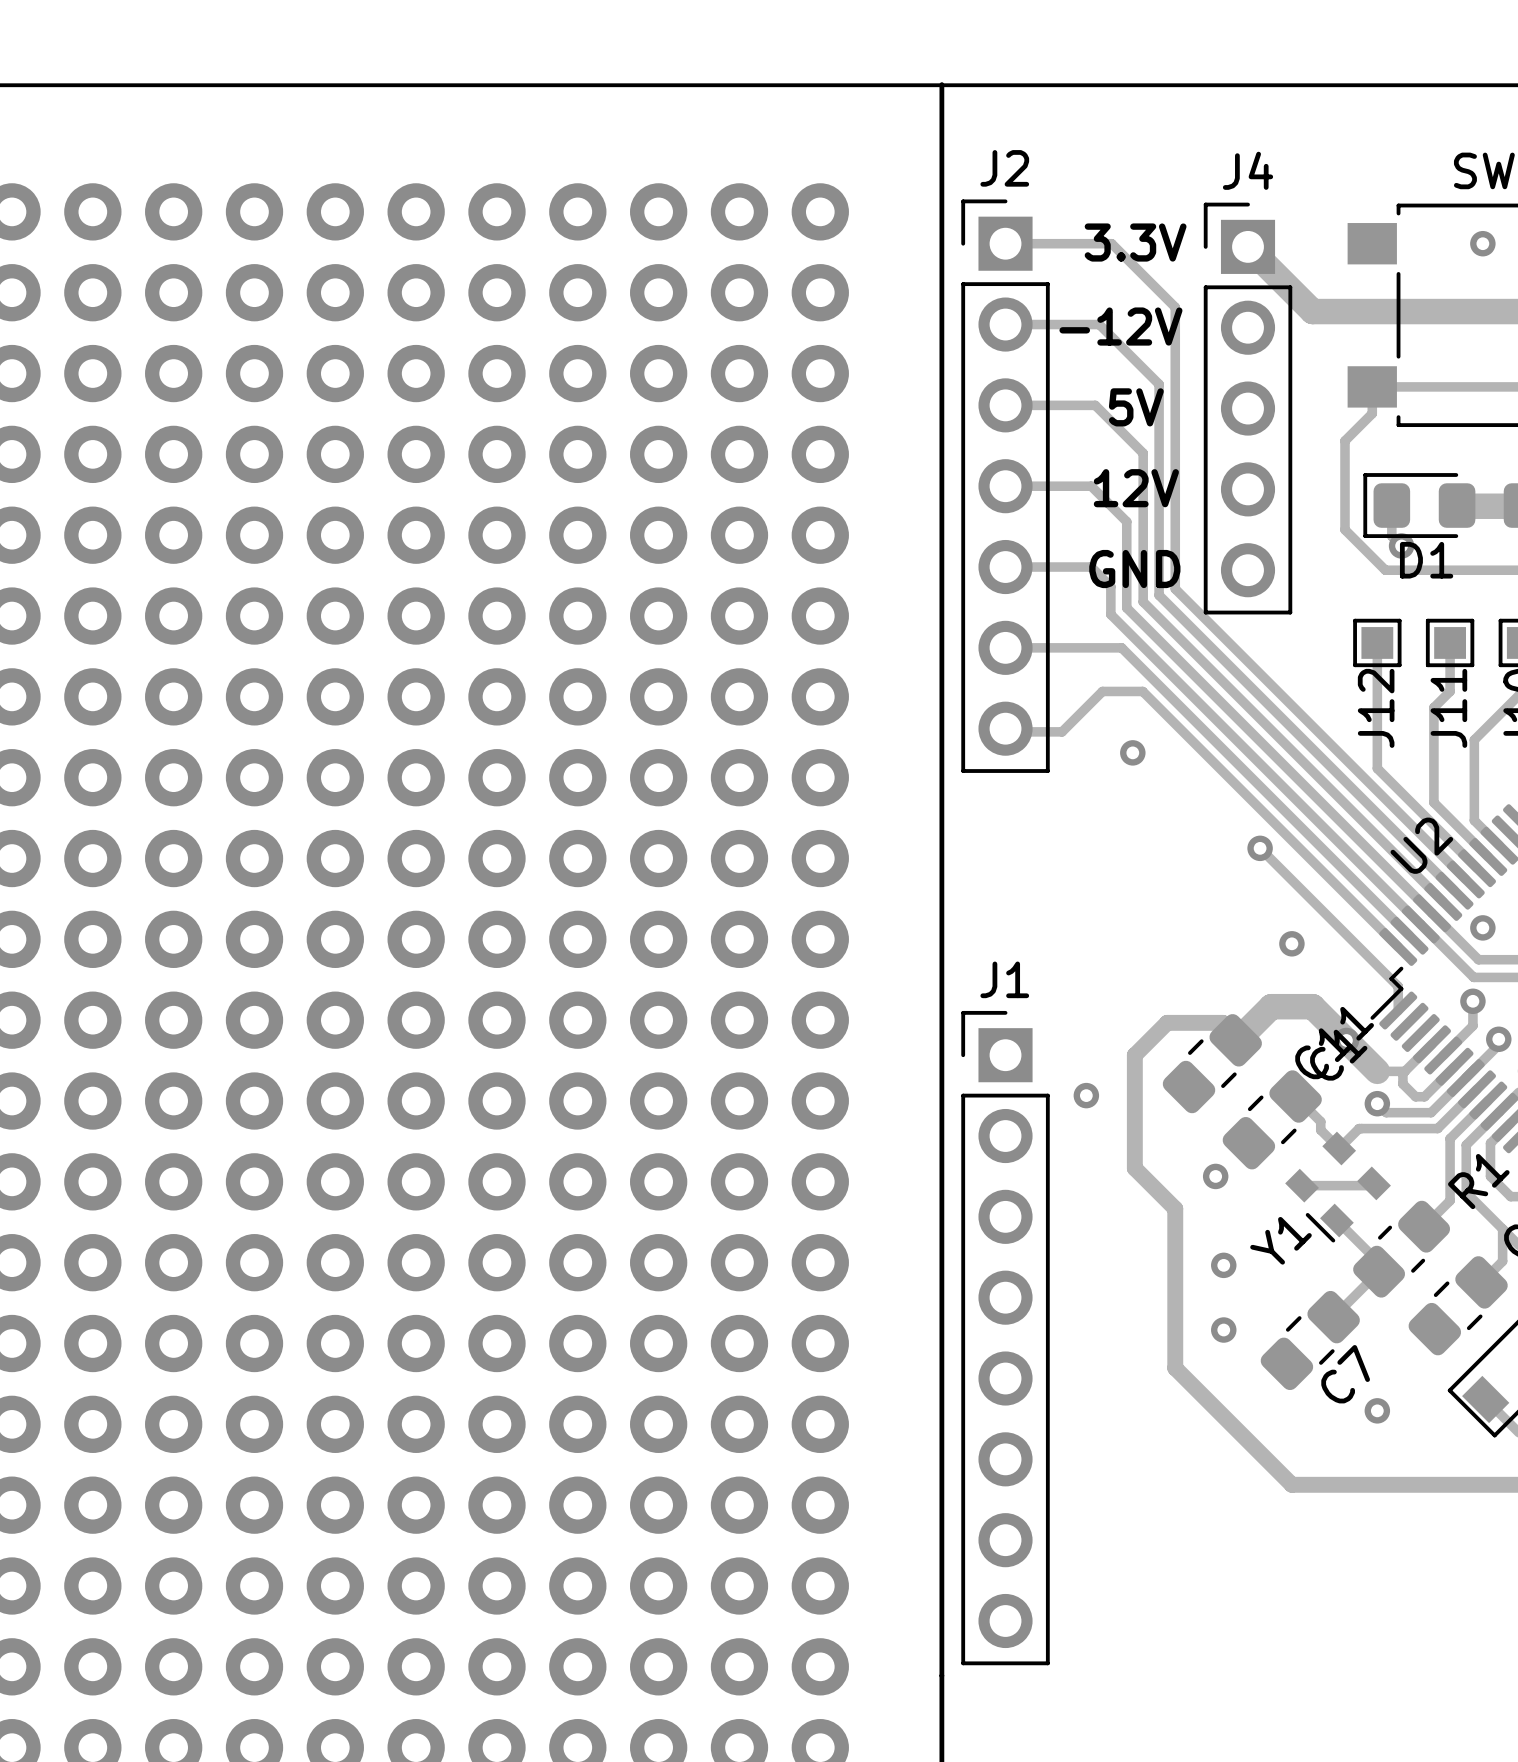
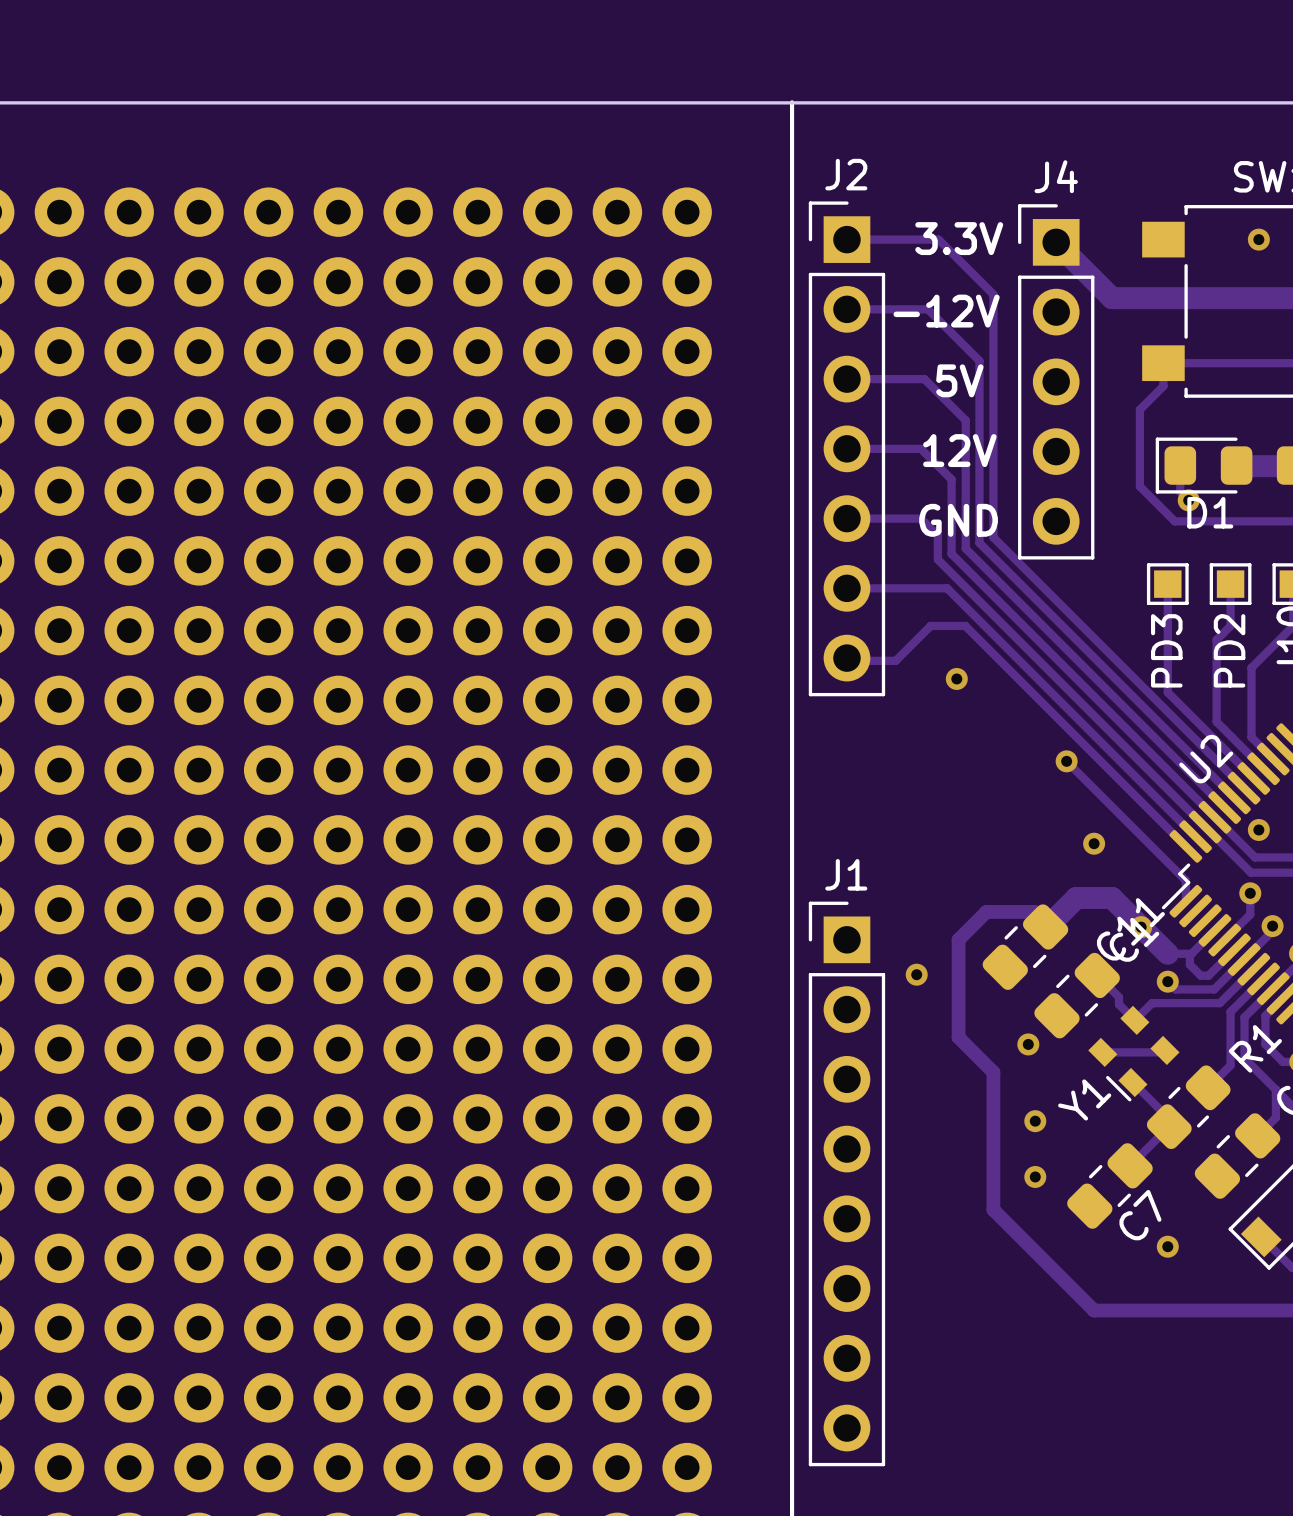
J12 name: J12 (1376, 708) -> none
J11 name: J11 (1448, 708) -> none
J12 value: none -> PD3 (1166, 650)
J11 value: none -> PD2 (1229, 650)

